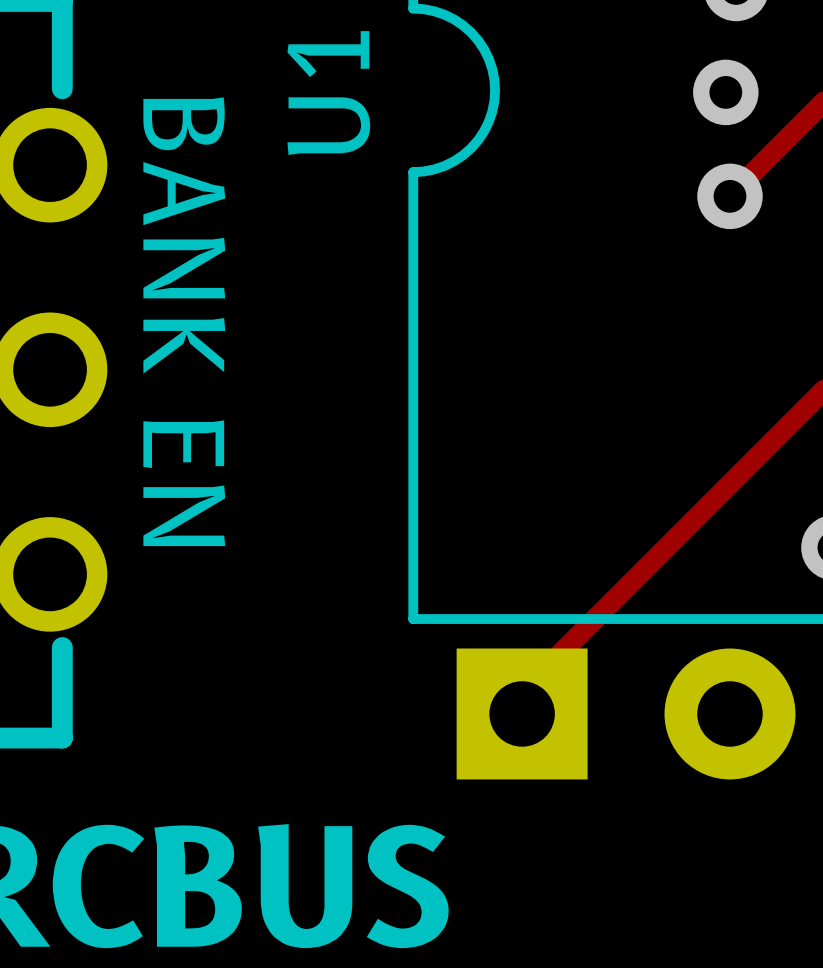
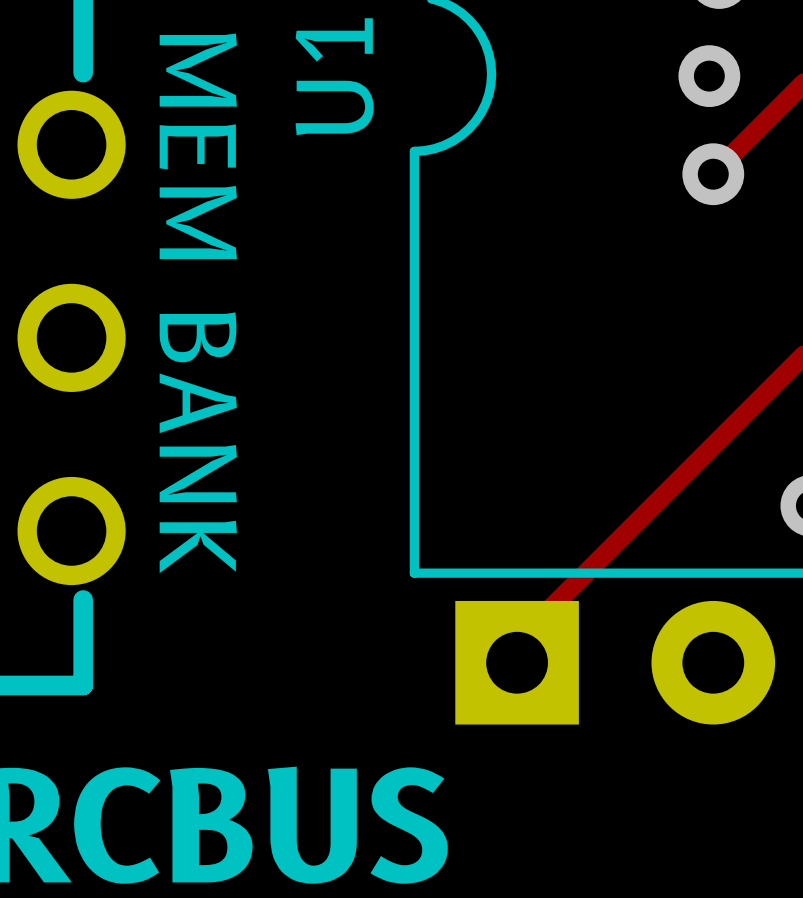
text: BANK EN (184, 321) -> MEM BANK (198, 303)

